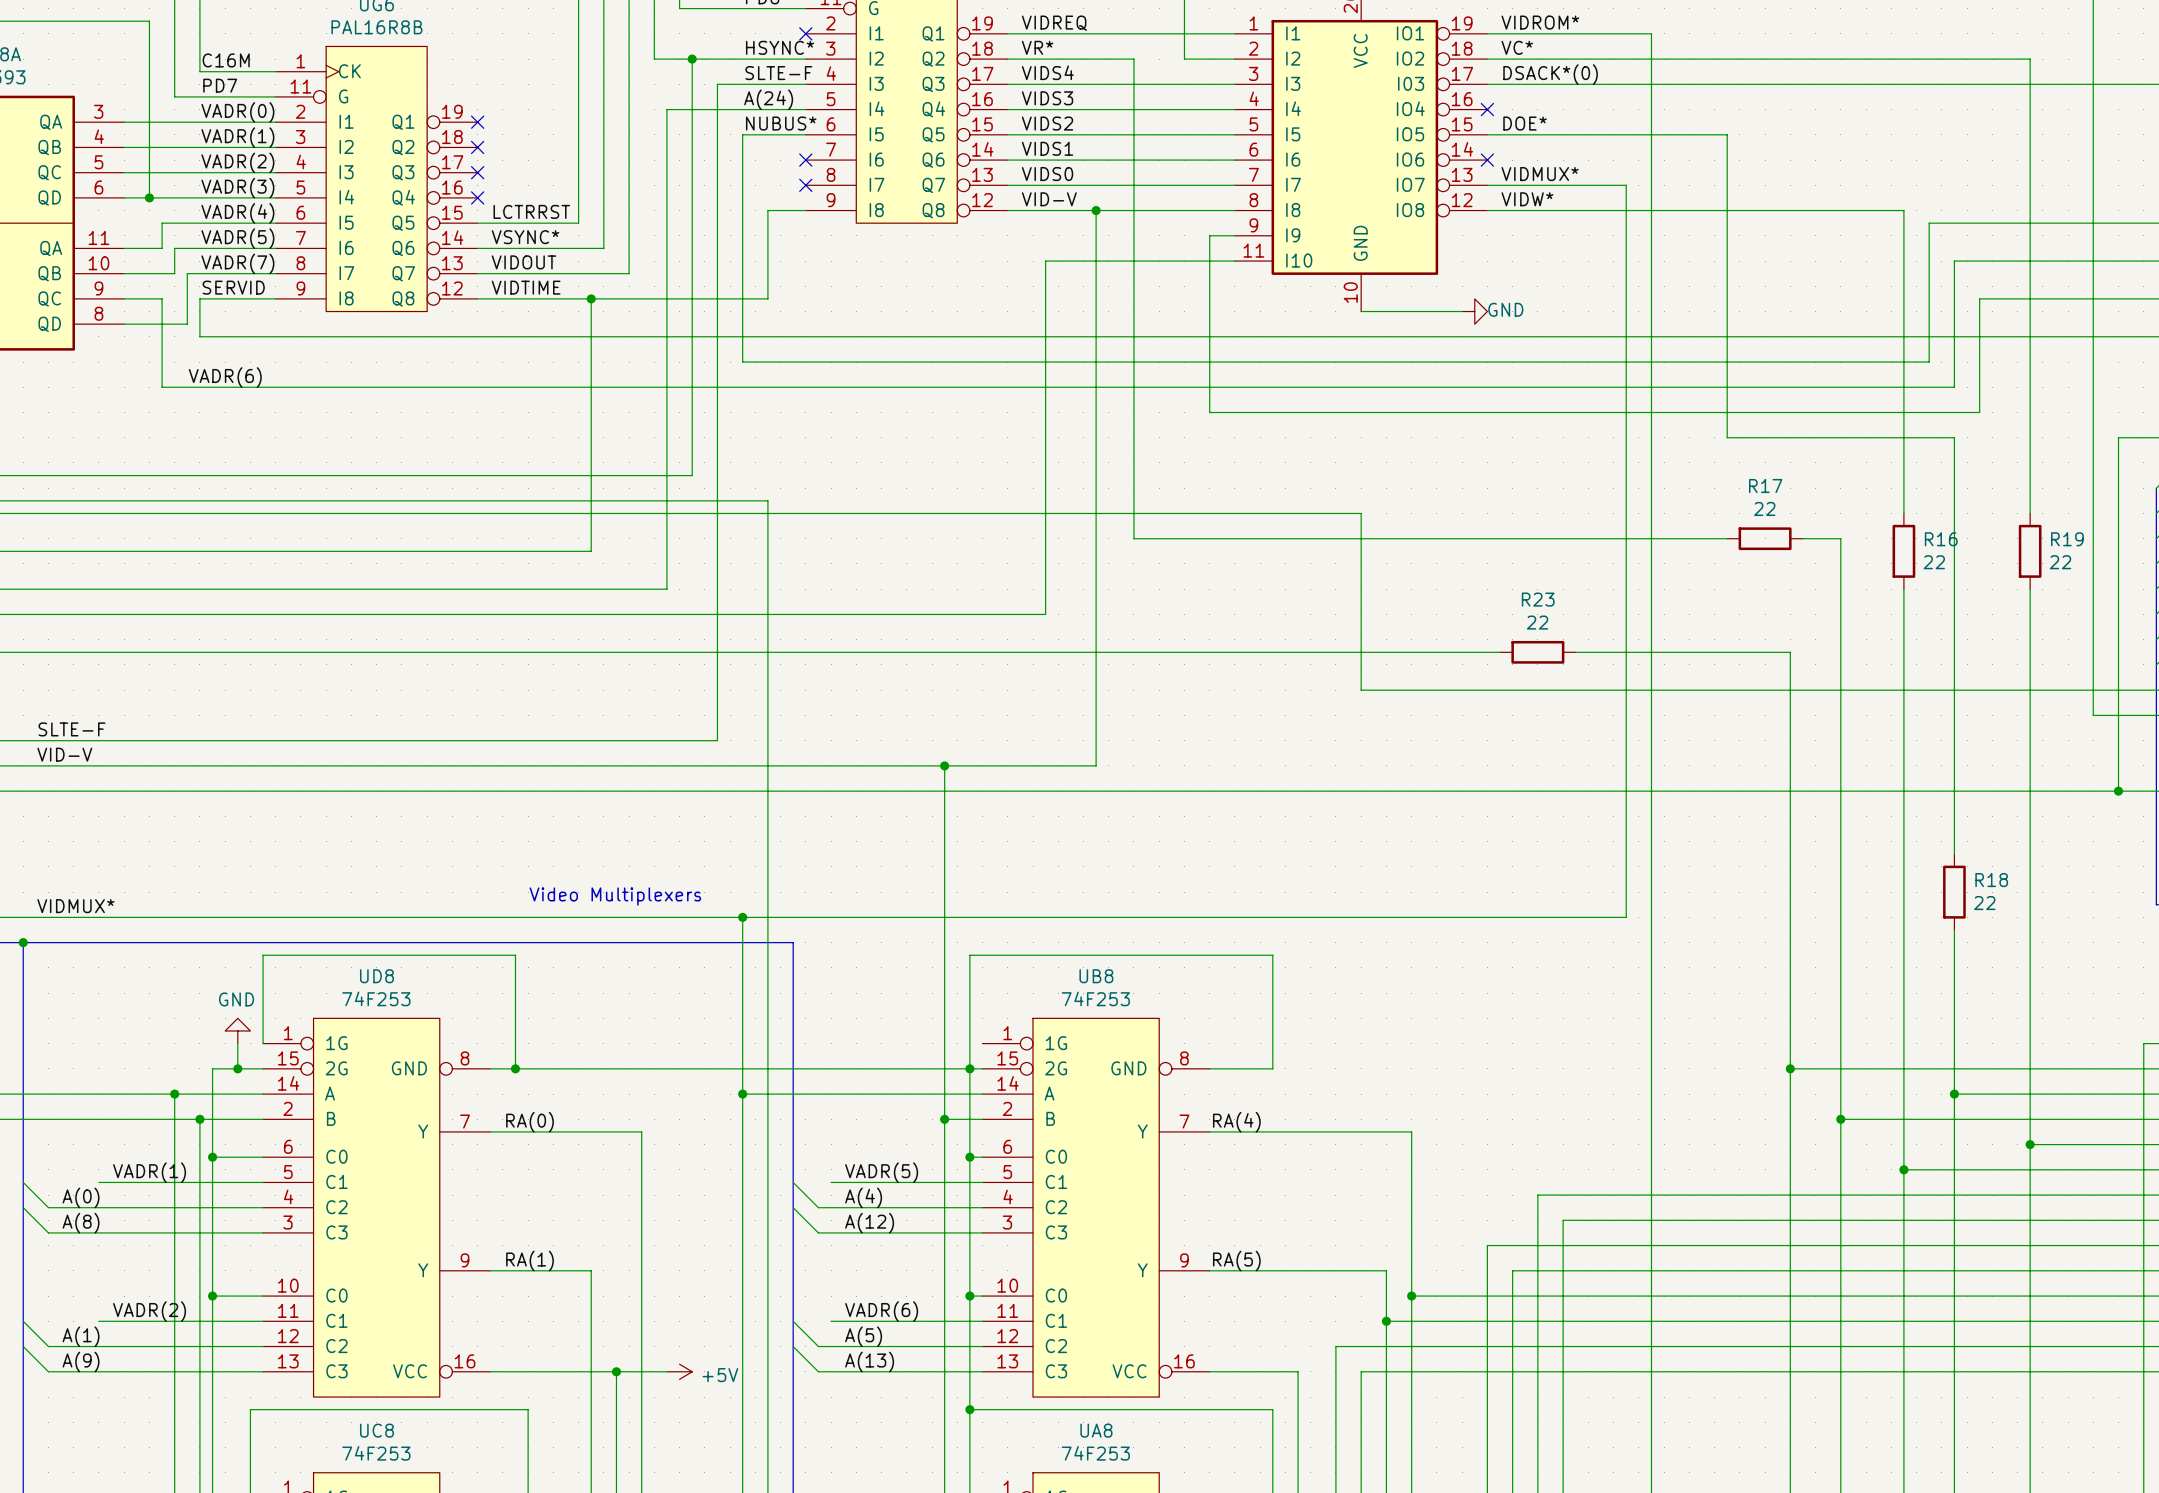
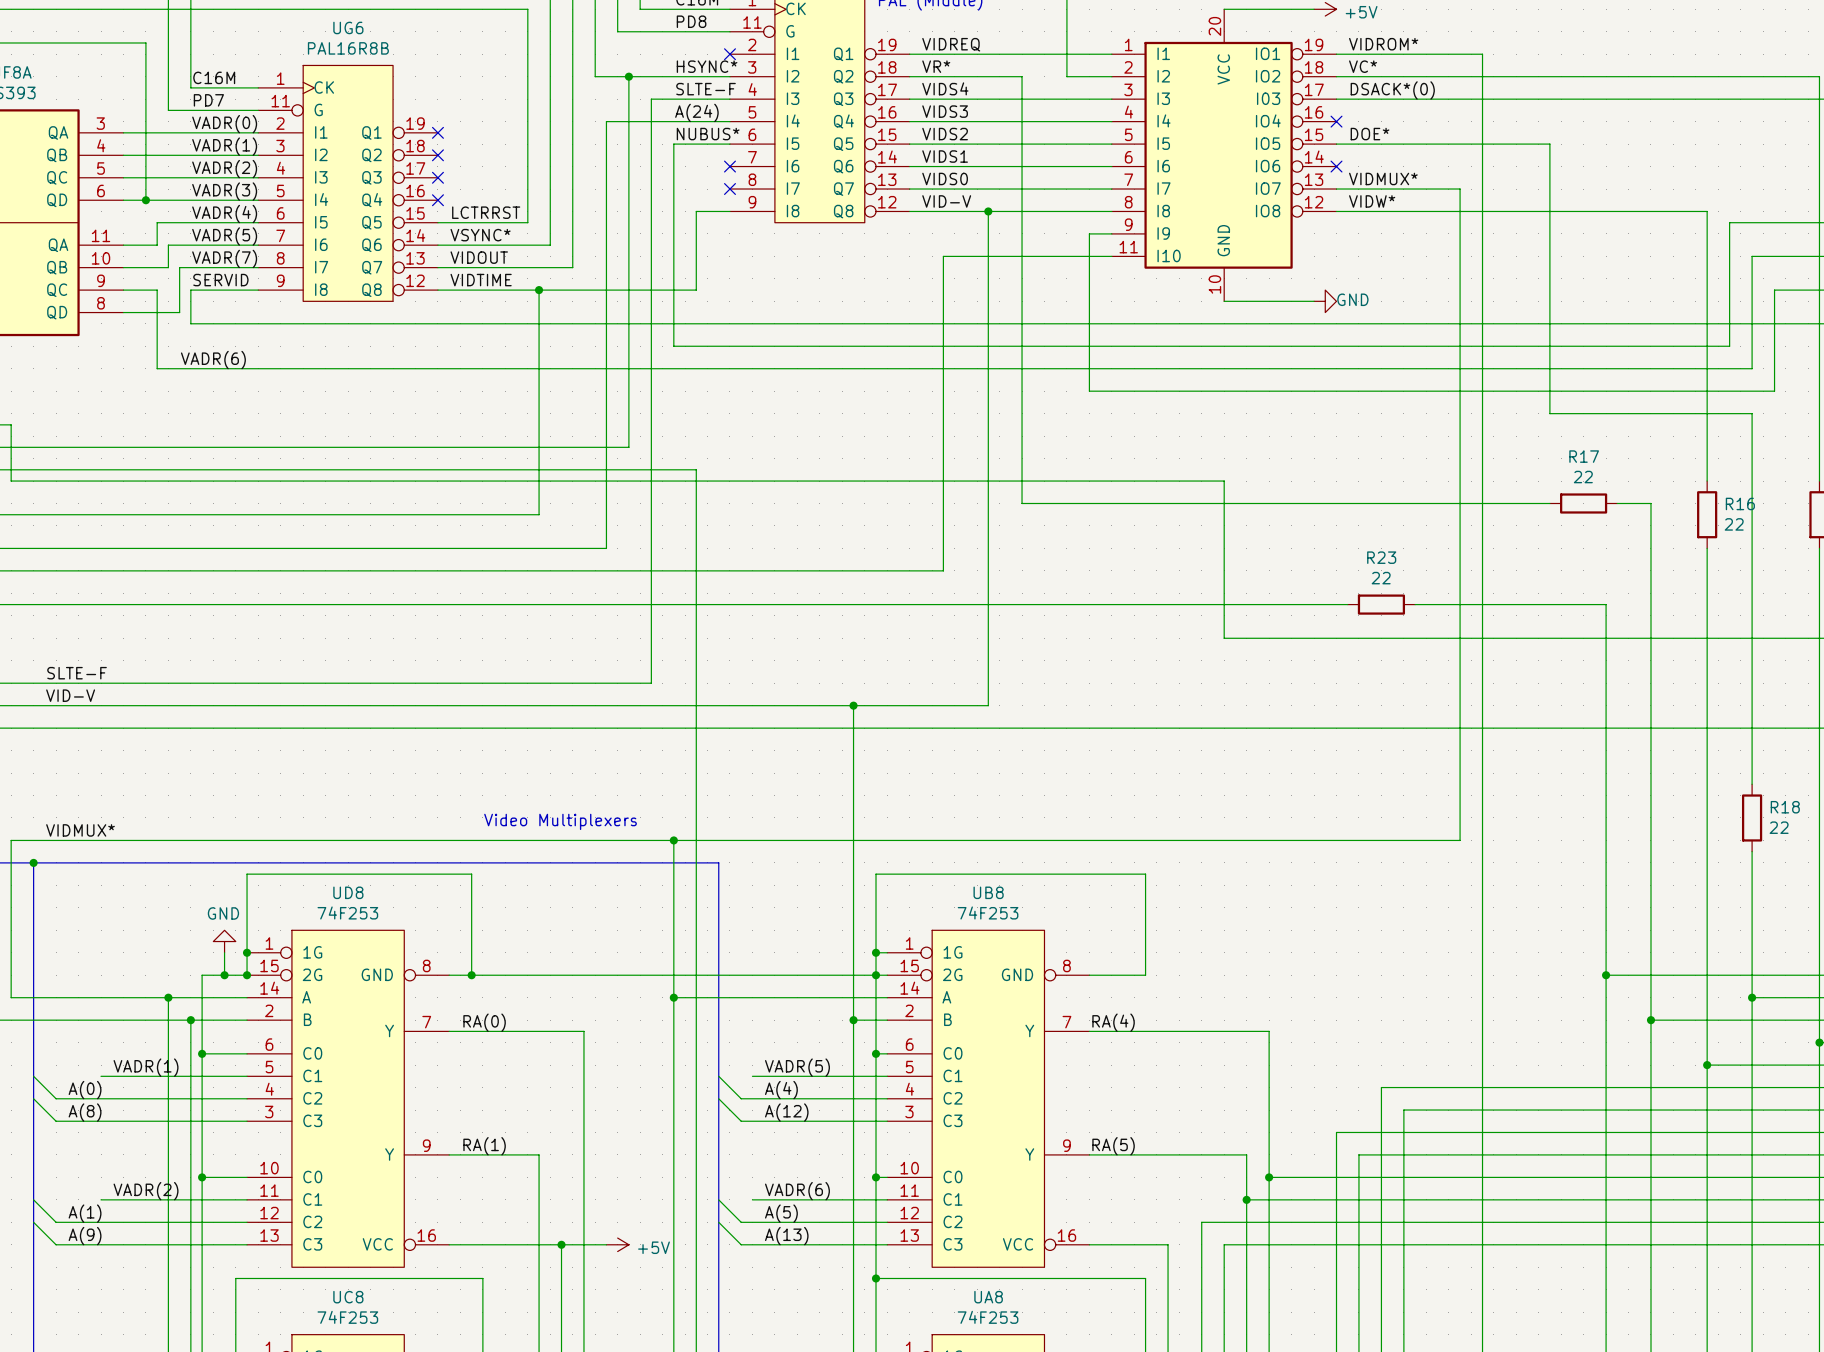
wire: none -> (247, 952) (247, 975)
junction: none -> (247, 952)
wire: none -> (876, 952) (887, 952)
junction: none -> (876, 952)
junction: none -> (247, 975)

